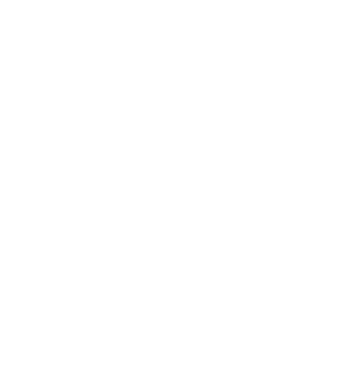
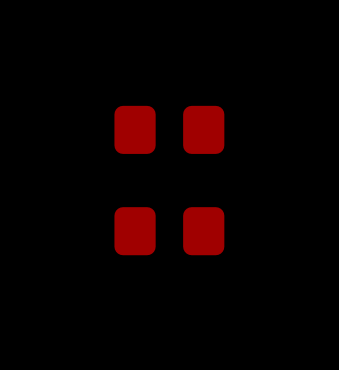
part: none -> (169, 129)
part: none -> (169, 231)

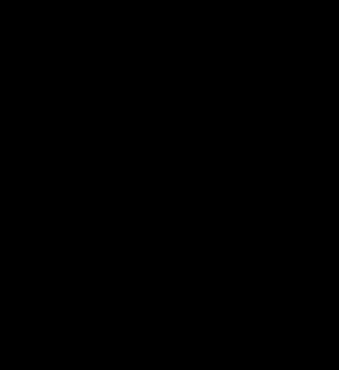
part: (169, 129) -> none
part: (169, 231) -> none

